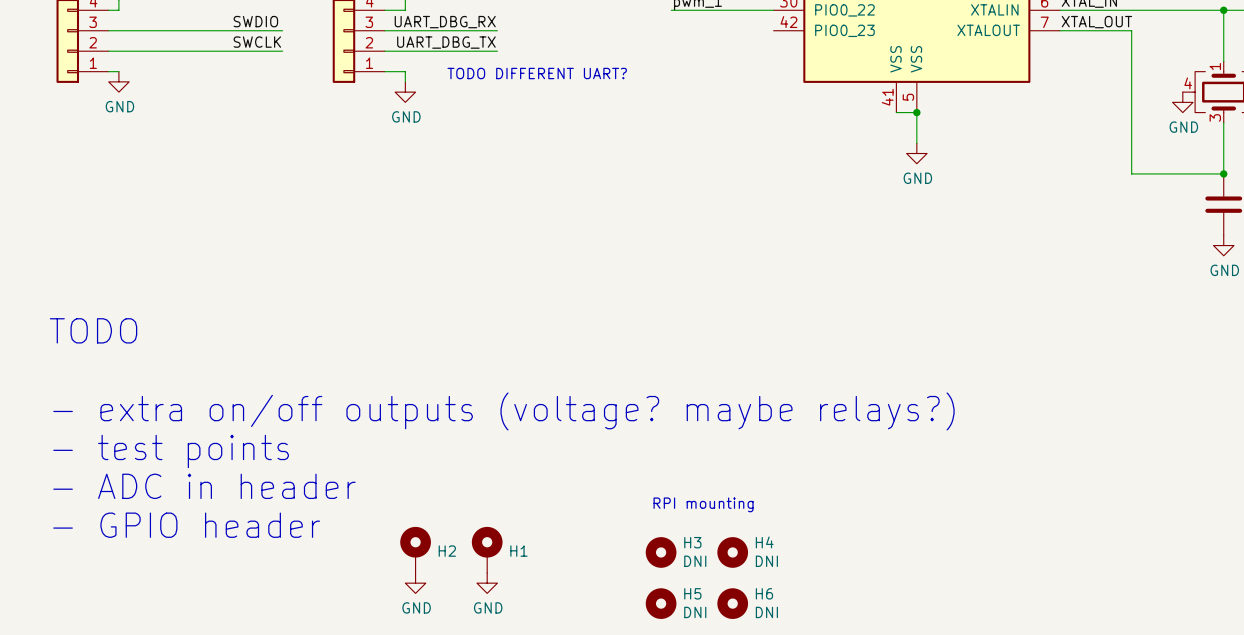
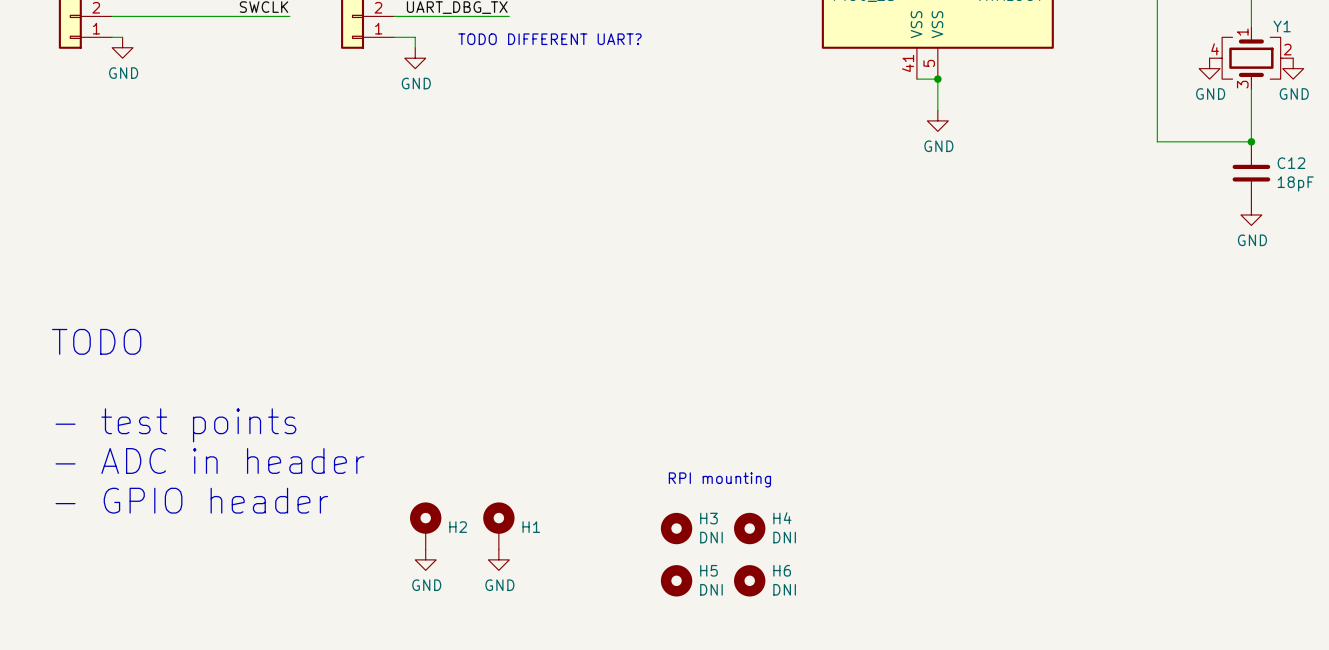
text position: TODO (93, 330) -> TODO (96, 341)
text: - extra on/off outputs (voltage? maybe relays?) (503, 411) -> none

